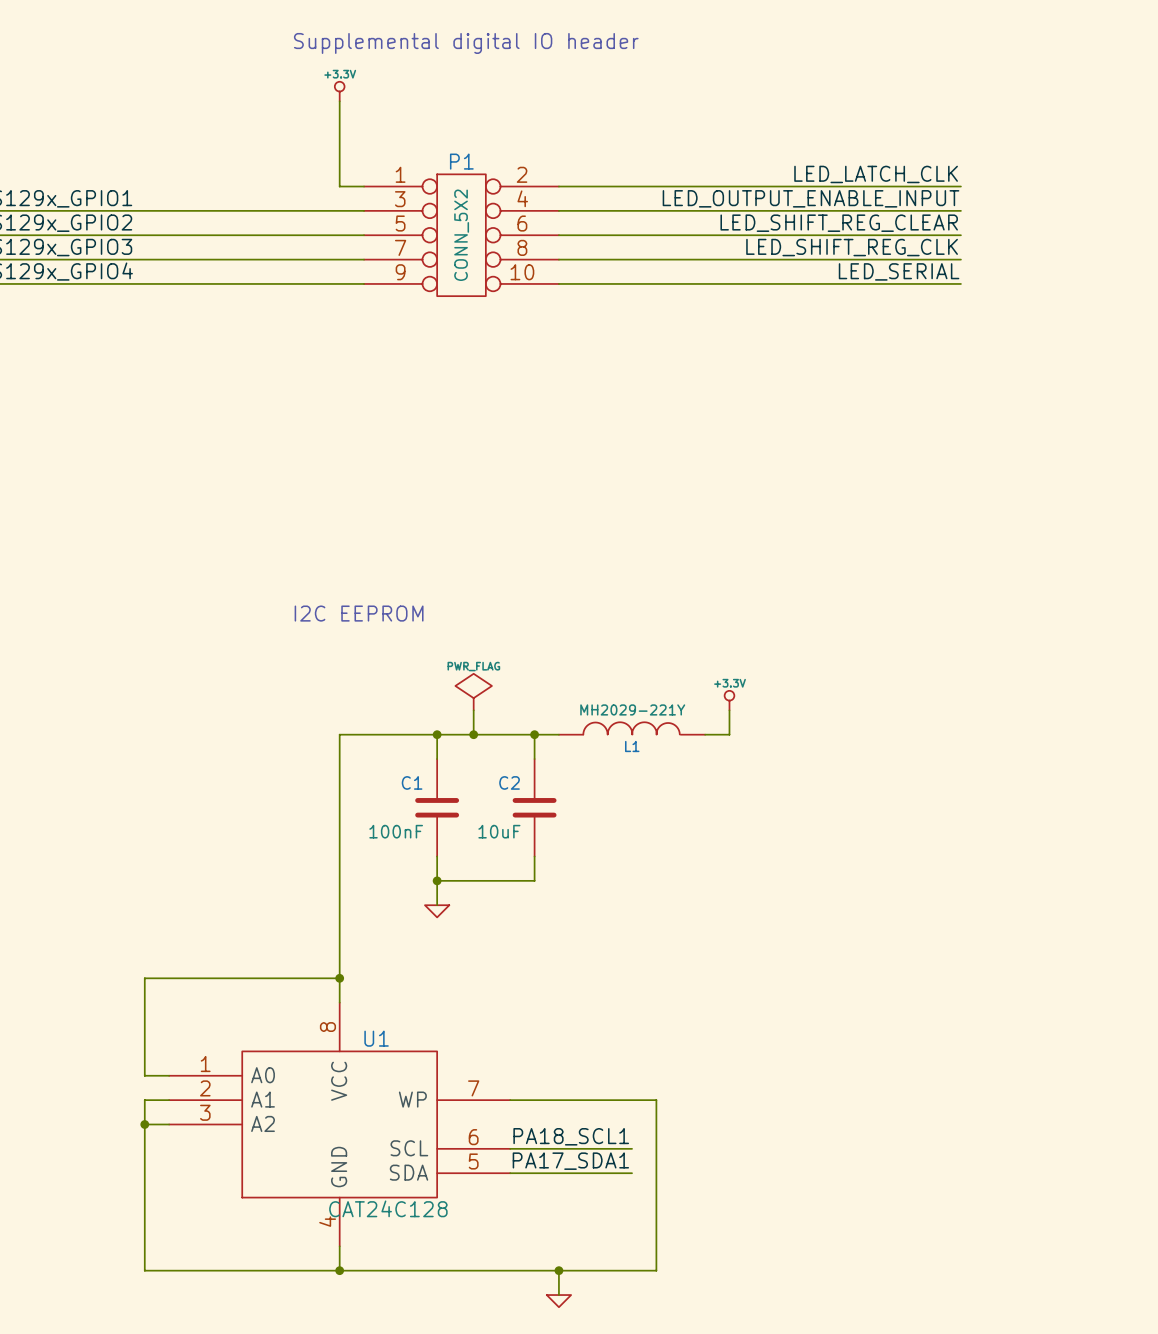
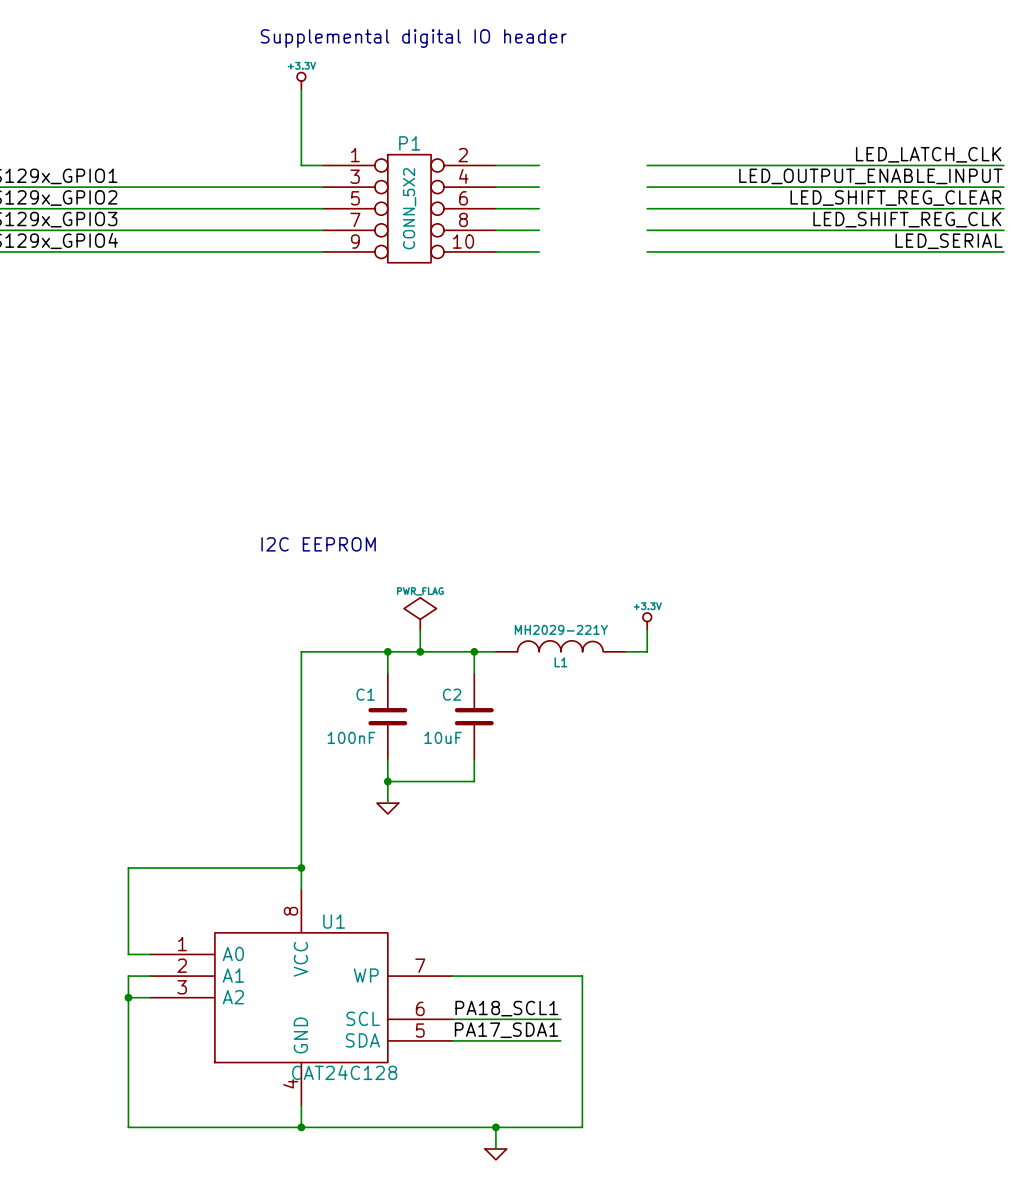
label position: LED_LATCH_CLK (876, 174) -> LED_LATCH_CLK (928, 154)
wire: (607, 186) (729, 186) -> none
wire: none -> (852, 165) (1003, 165)
label position: LED_OUTPUT_ENABLE_INPUT (811, 198) -> LED_OUTPUT_ENABLE_INPUT (870, 176)
wire: (607, 210) (729, 210) -> none
wire: none -> (852, 187) (1003, 187)
label position: LED_SHIFT_REG_CLEAR (839, 223) -> LED_SHIFT_REG_CLEAR (895, 198)
wire: (607, 235) (729, 235) -> none
wire: none -> (852, 208) (1003, 208)
label position: LED_SHIFT_REG_CLK (852, 247) -> LED_SHIFT_REG_CLK (907, 219)
wire: (607, 259) (729, 259) -> none
wire: none -> (852, 230) (1003, 230)
label position: LED_SERIAL (899, 271) -> LED_SERIAL (948, 241)
wire: (607, 283) (729, 283) -> none
wire: none -> (852, 251) (1003, 251)

